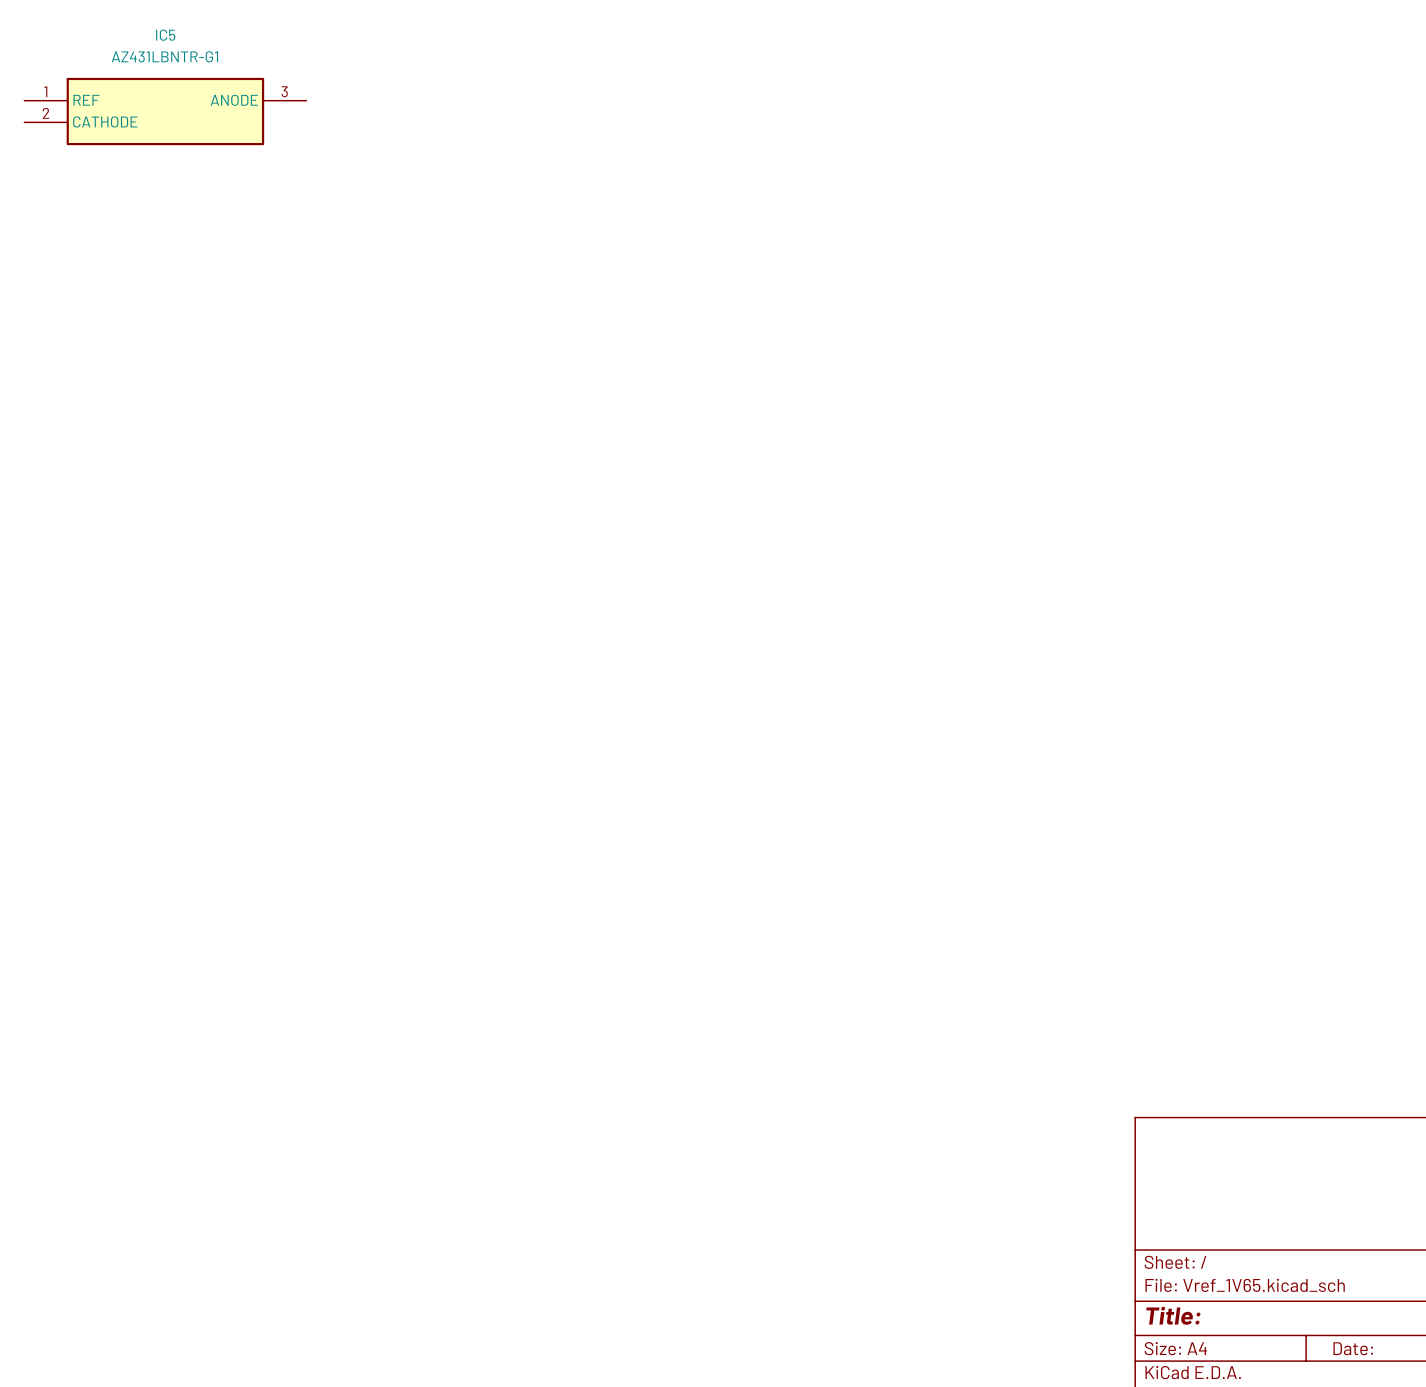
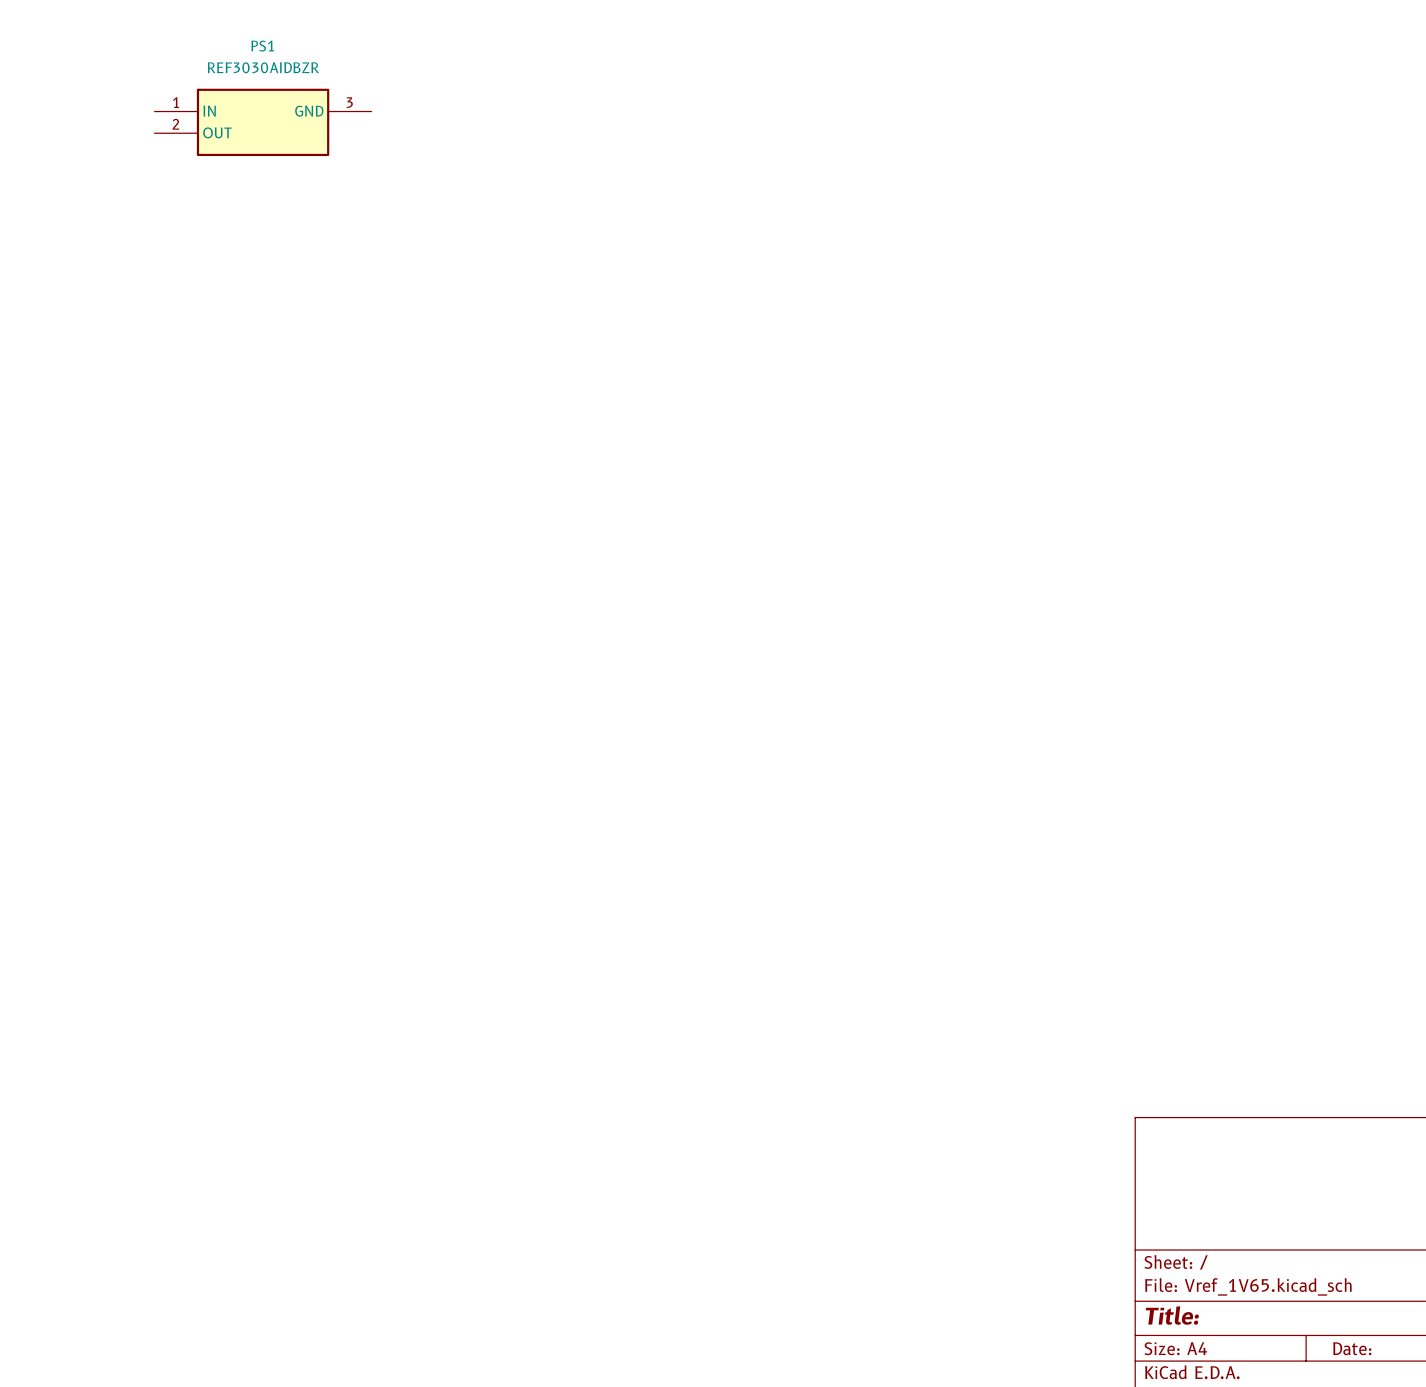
IC5: AZ431LBNTR-G1 (165, 111) -> none
PS1: none -> REF3030AIDBZR (263, 122)

